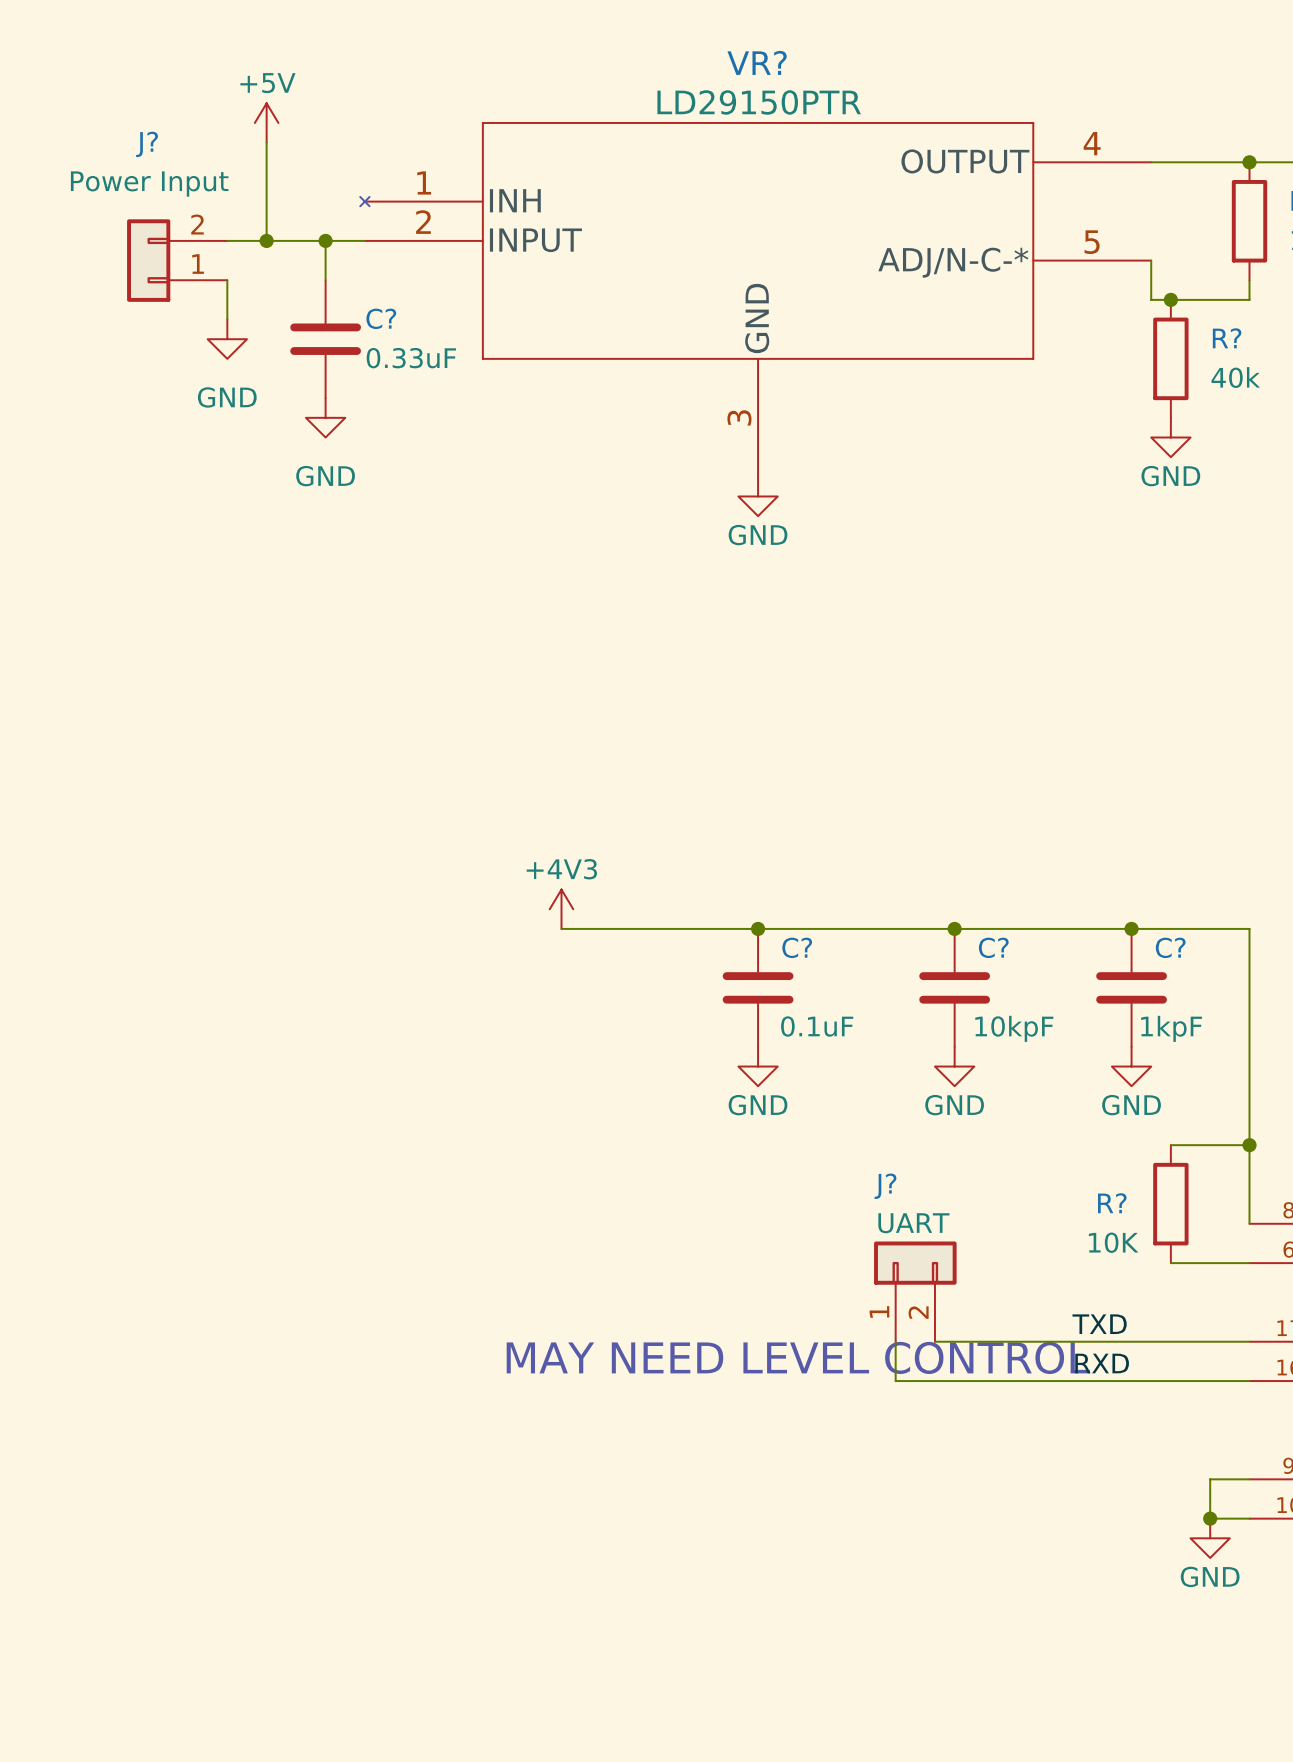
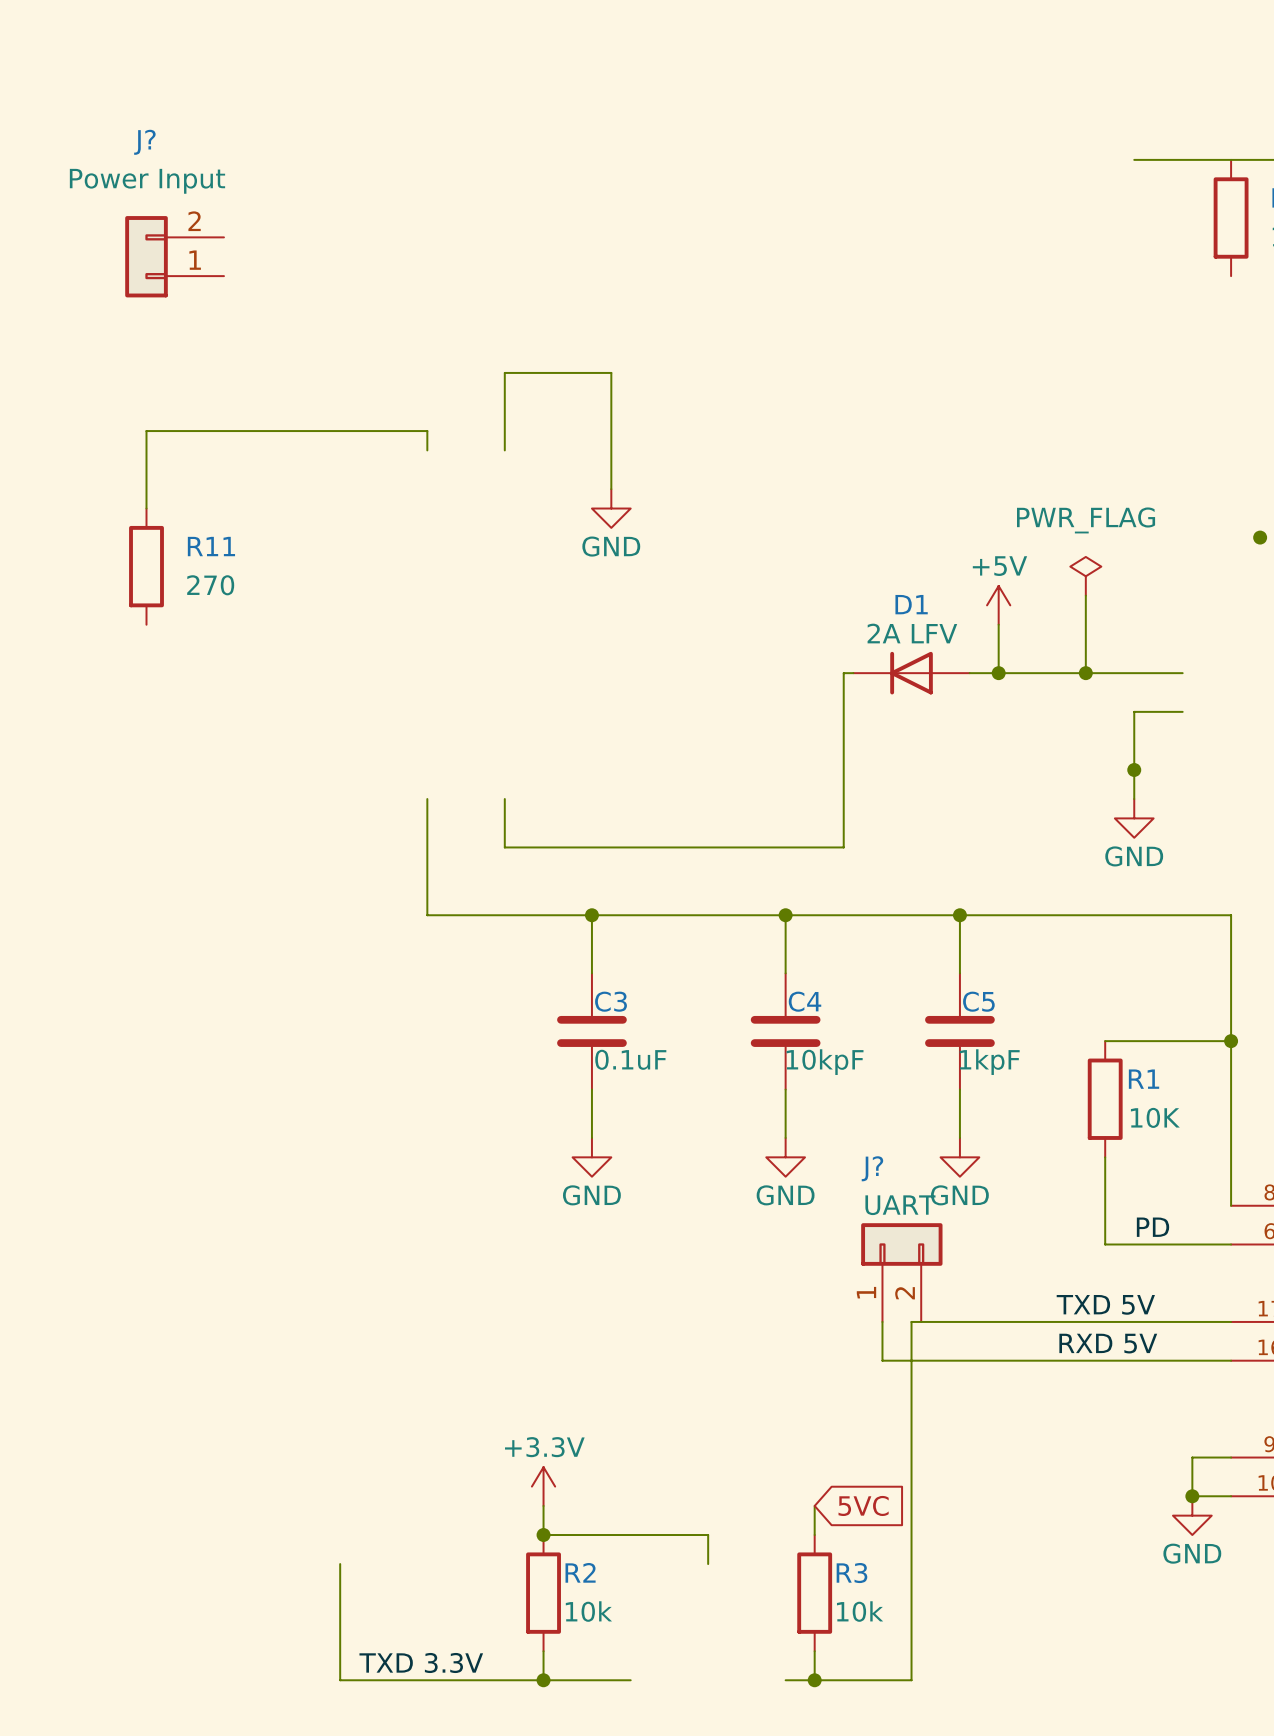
power symbol: +5V (266, 122) -> none
wire: (266, 142) (266, 240) -> none
junction: (1249, 162) -> none
wire: (227, 240) (364, 240) -> none
junction: (266, 240) -> none
wire: (325, 240) (325, 280) -> none
junction: (325, 240) -> none
wire: (1151, 260) (1151, 299) (1249, 299) (1249, 280) -> none
wire: (227, 280) (227, 319) -> none
VR?: LD29150PTR (755, 299) -> none
junction: (1170, 299) -> none
power symbol: GND (227, 339) -> none
C?: 0.33uF (325, 339) -> none
R?: 40k (1170, 358) -> none
power symbol: GND (325, 417) -> none
power symbol: GND (1170, 437) -> none
wire: none -> (427, 450) (427, 431) (146, 431) (146, 508)
wire: none -> (504, 450) (504, 372) (611, 372) (611, 489)
power symbol position: GND (758, 496) -> GND (611, 508)
junction: none -> (1260, 537)
R11: none -> 270 (146, 566)
power symbol: none -> PWR_FLAG (1085, 576)
wire: none -> (1085, 595) (1085, 673)
power symbol: none -> +5V (998, 605)
wire: none -> (998, 624) (998, 673)
wire: none -> (853, 673) (843, 673) (843, 847) (504, 847) (504, 799)
D1: none -> 2A LFV (911, 673)
wire: none -> (969, 673) (1182, 673)
junction: none -> (998, 673)
junction: none -> (1085, 673)
wire: none -> (1182, 711) (1134, 711) (1134, 799)
junction: none -> (1134, 769)
wire: none -> (427, 799) (427, 915) (553, 915)
power symbol: none -> GND (1134, 818)
power symbol: +4V3 (561, 909) -> none
wire: none -> (591, 915) (591, 973)
junction: none -> (591, 915)
junction position: (758, 928) -> (785, 915)
wire: none -> (785, 915) (785, 973)
junction position: (954, 928) -> (959, 915)
wire: none -> (959, 915) (959, 973)
junction: (1131, 928) -> none
C?: 0.1uF (758, 987) -> none
C?: 10kpF (954, 987) -> none
C?: 1kpF (1131, 987) -> none
C3: none -> 0.1uF (591, 1031)
C4: none -> 10kpF (785, 1031)
C5: none -> 1kpF (959, 1031)
wire: none -> (1105, 1041) (1231, 1041)
junction: none -> (1231, 1041)
power symbol: GND (758, 1066) -> none
power symbol: GND (954, 1066) -> none
power symbol: GND (1131, 1066) -> none
wire: none -> (591, 1089) (591, 1137)
wire: none -> (785, 1089) (785, 1137)
wire: none -> (959, 1089) (959, 1137)
R1: none -> 10K (1105, 1099)
wire: (1170, 1145) (1249, 1145) -> none
junction: (1249, 1145) -> none
power symbol: none -> GND (591, 1157)
power symbol: none -> GND (785, 1157)
power symbol: none -> GND (959, 1157)
wire: none -> (1105, 1157) (1105, 1244) (1153, 1244)
R?: 10K (1170, 1204) -> none
label: none -> PD (1153, 1227)
label: TXD (1099, 1324) -> TXD 5V (1105, 1304)
wire: none -> (921, 1321) (911, 1321) (911, 1680) (785, 1680)
text: MAY NEED LEVEL CONTROL (798, 1357) -> none
label: RXD (1102, 1363) -> RXD 5V (1108, 1343)
power symbol: none -> +3.3V (543, 1486)
wire: none -> (543, 1505) (543, 1535) (708, 1535) (708, 1564)
wire: none -> (814, 1505) (814, 1535)
global label: none -> 5VC (863, 1505)
junction: none -> (543, 1535)
wire: none -> (340, 1564) (340, 1680) (630, 1680)
R2: none -> 10k (543, 1593)
R3: none -> 10k (814, 1593)
wire: none -> (543, 1651) (543, 1680)
wire: none -> (814, 1651) (814, 1680)
label: none -> TXD 3.3V (421, 1662)
junction: none -> (543, 1680)
junction: none -> (814, 1680)

